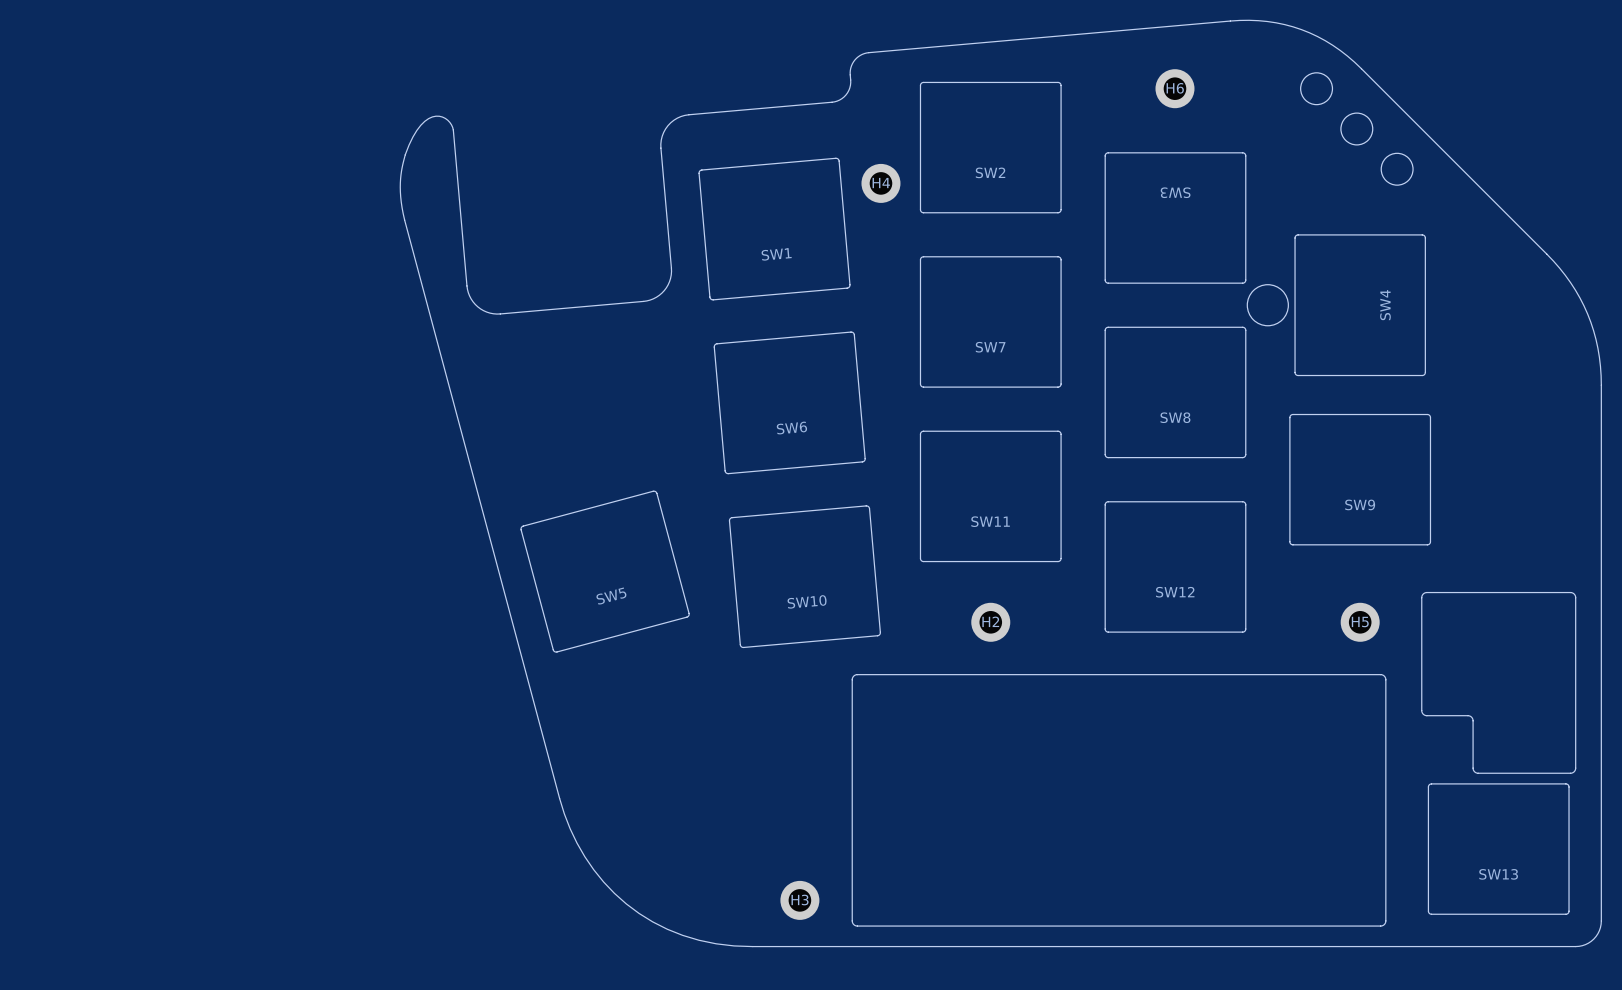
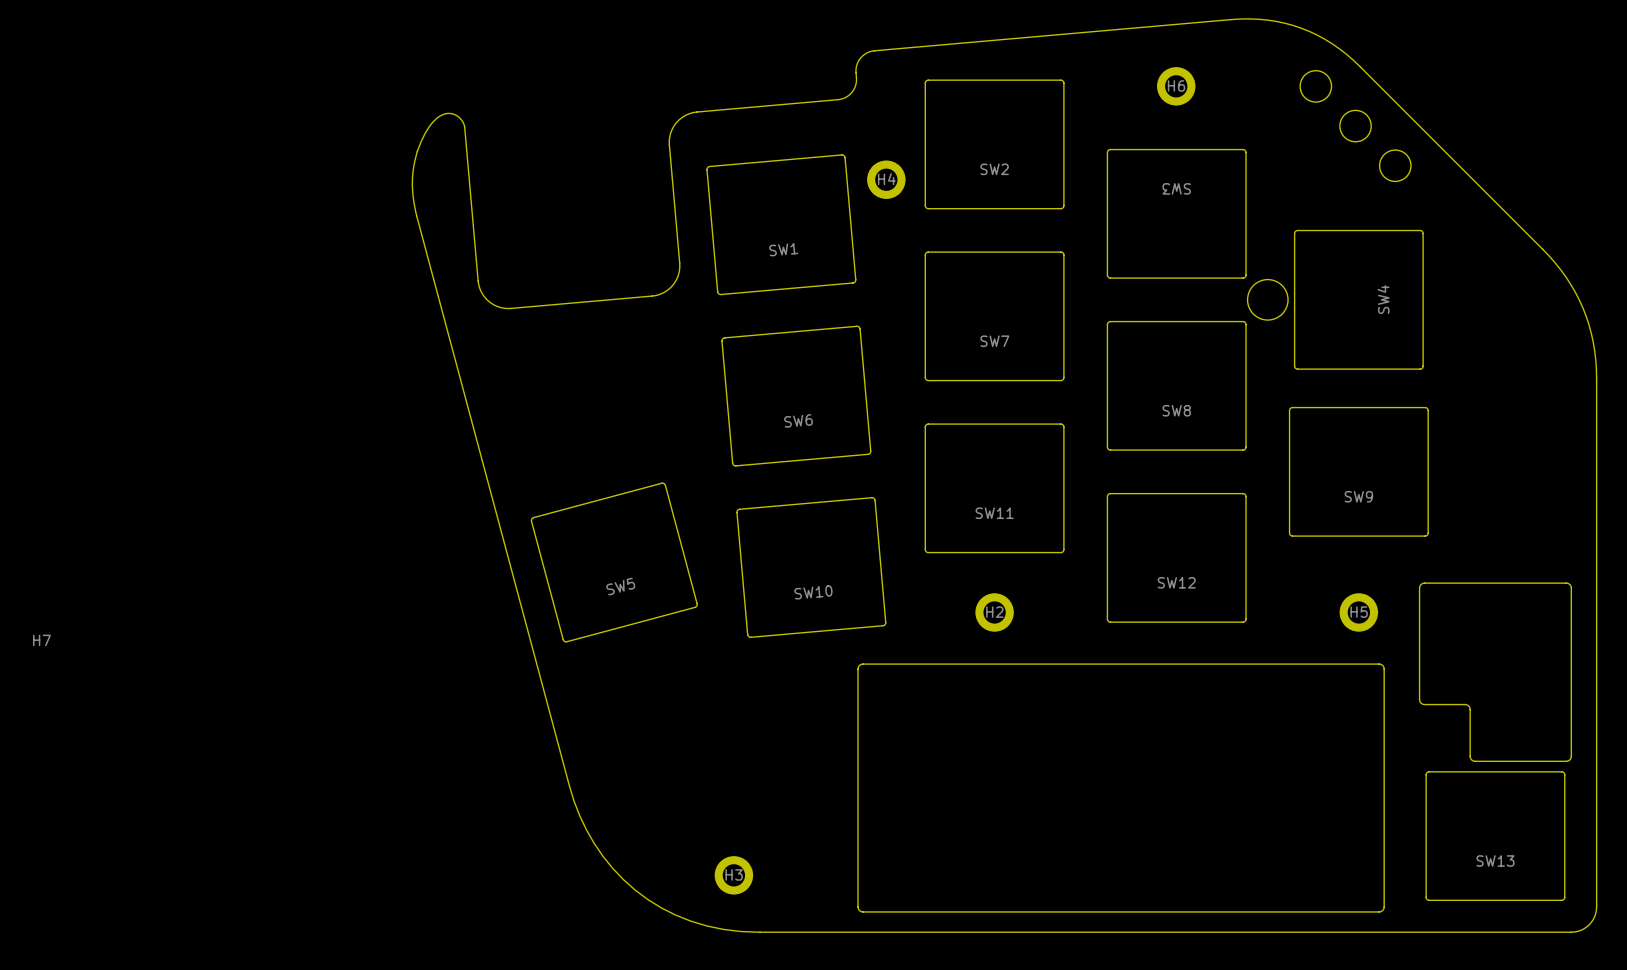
H7: none -> (41, 640)
H3 position: (799, 900) -> (733, 875)

